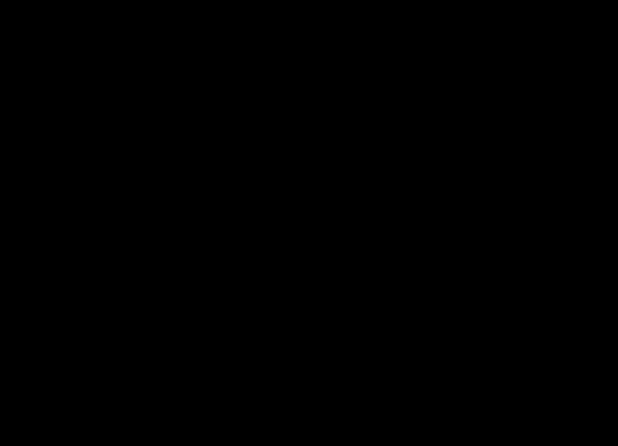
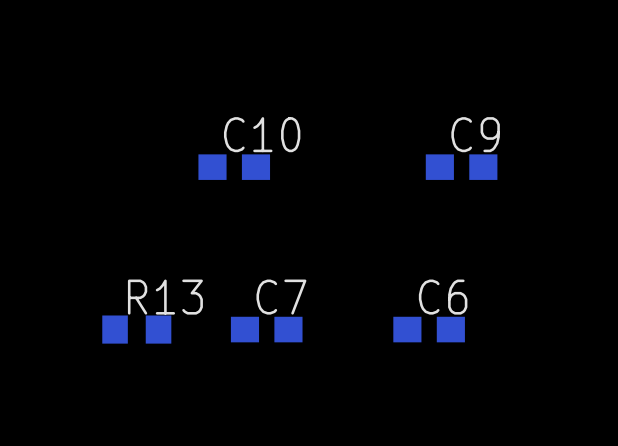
C10: none -> (234, 167)
C9: none -> (461, 167)
R13: none -> (136, 329)
C7: none -> (266, 329)
C6: none -> (429, 329)

